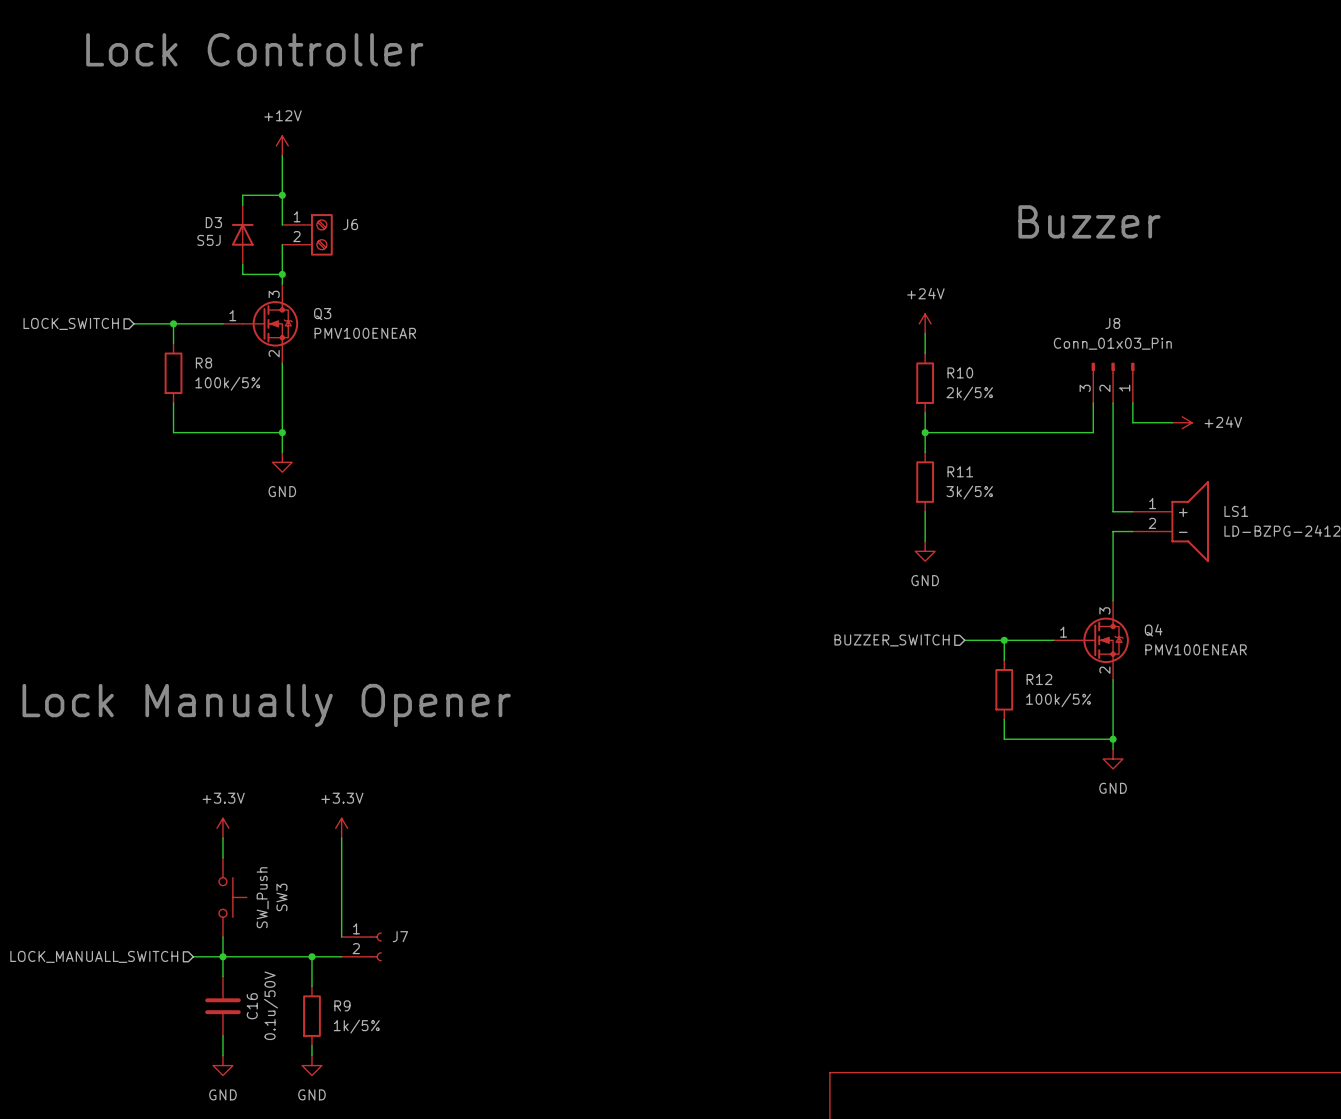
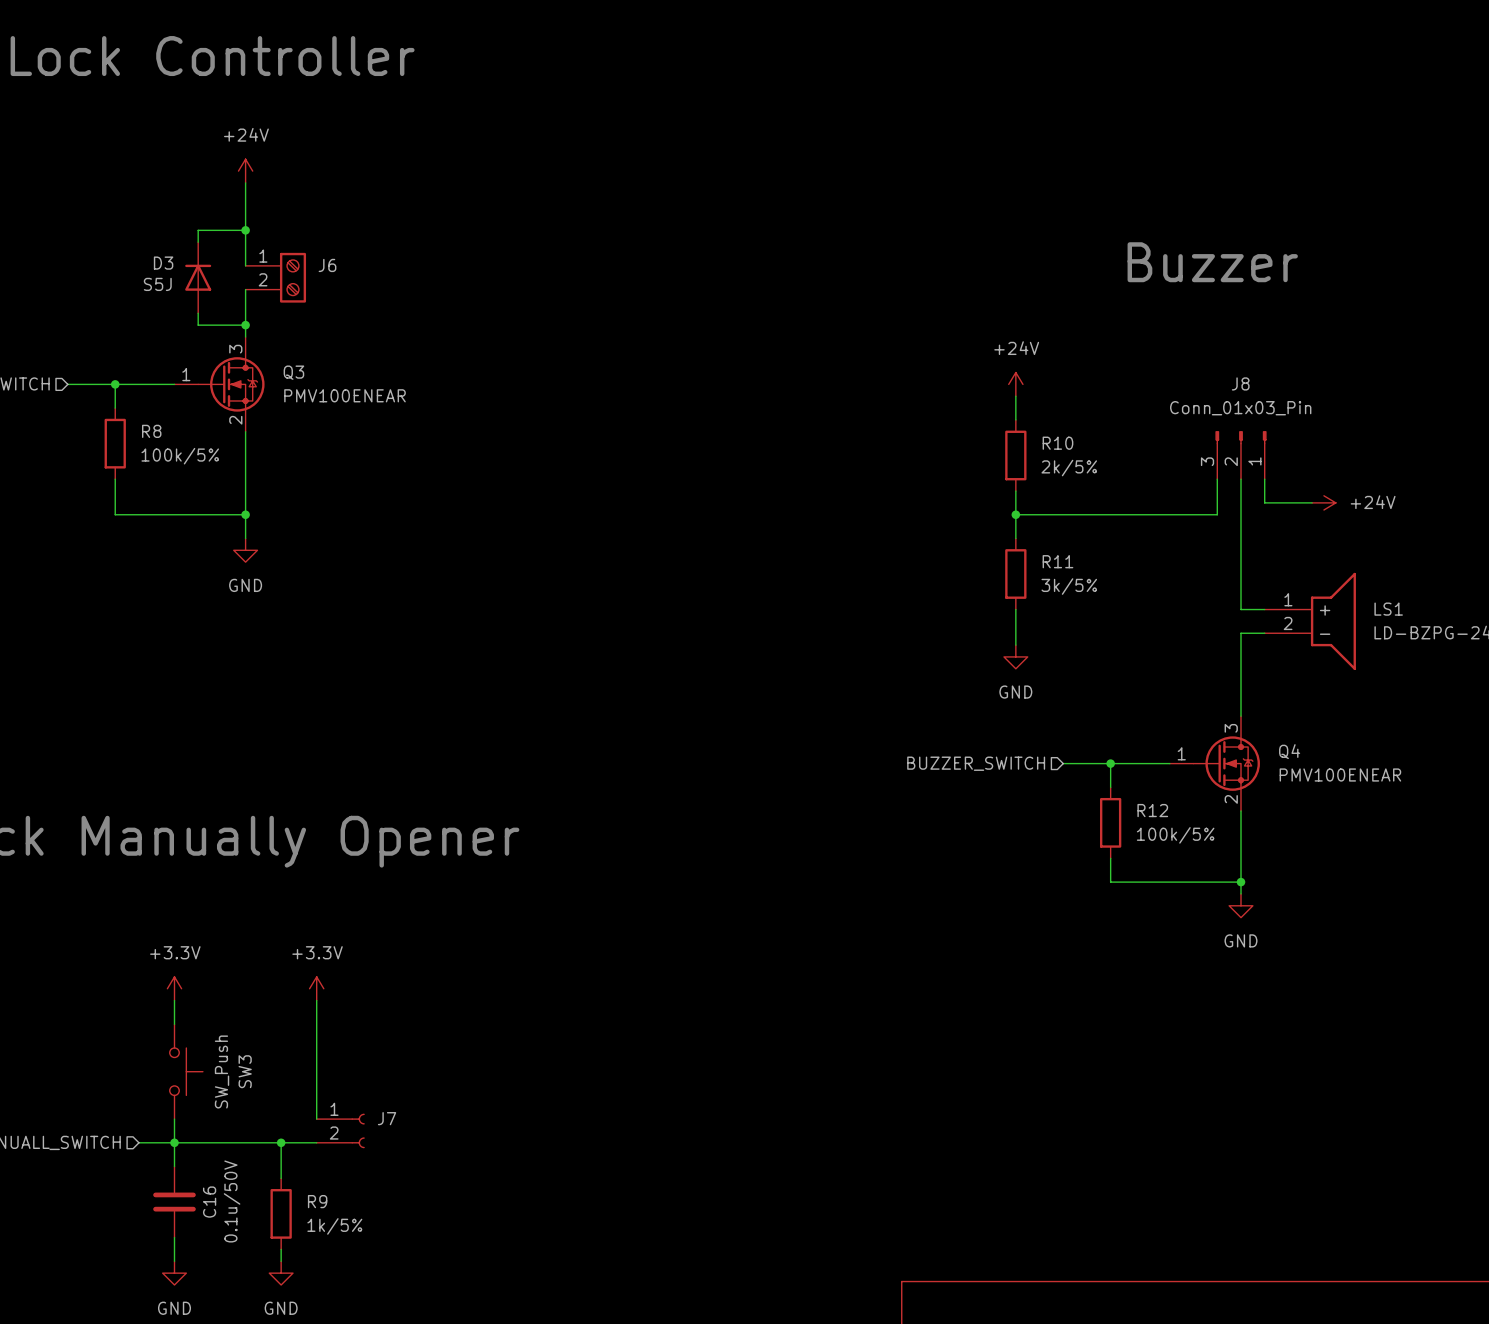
power symbol: +12V (282, 145) -> +24V (245, 171)

